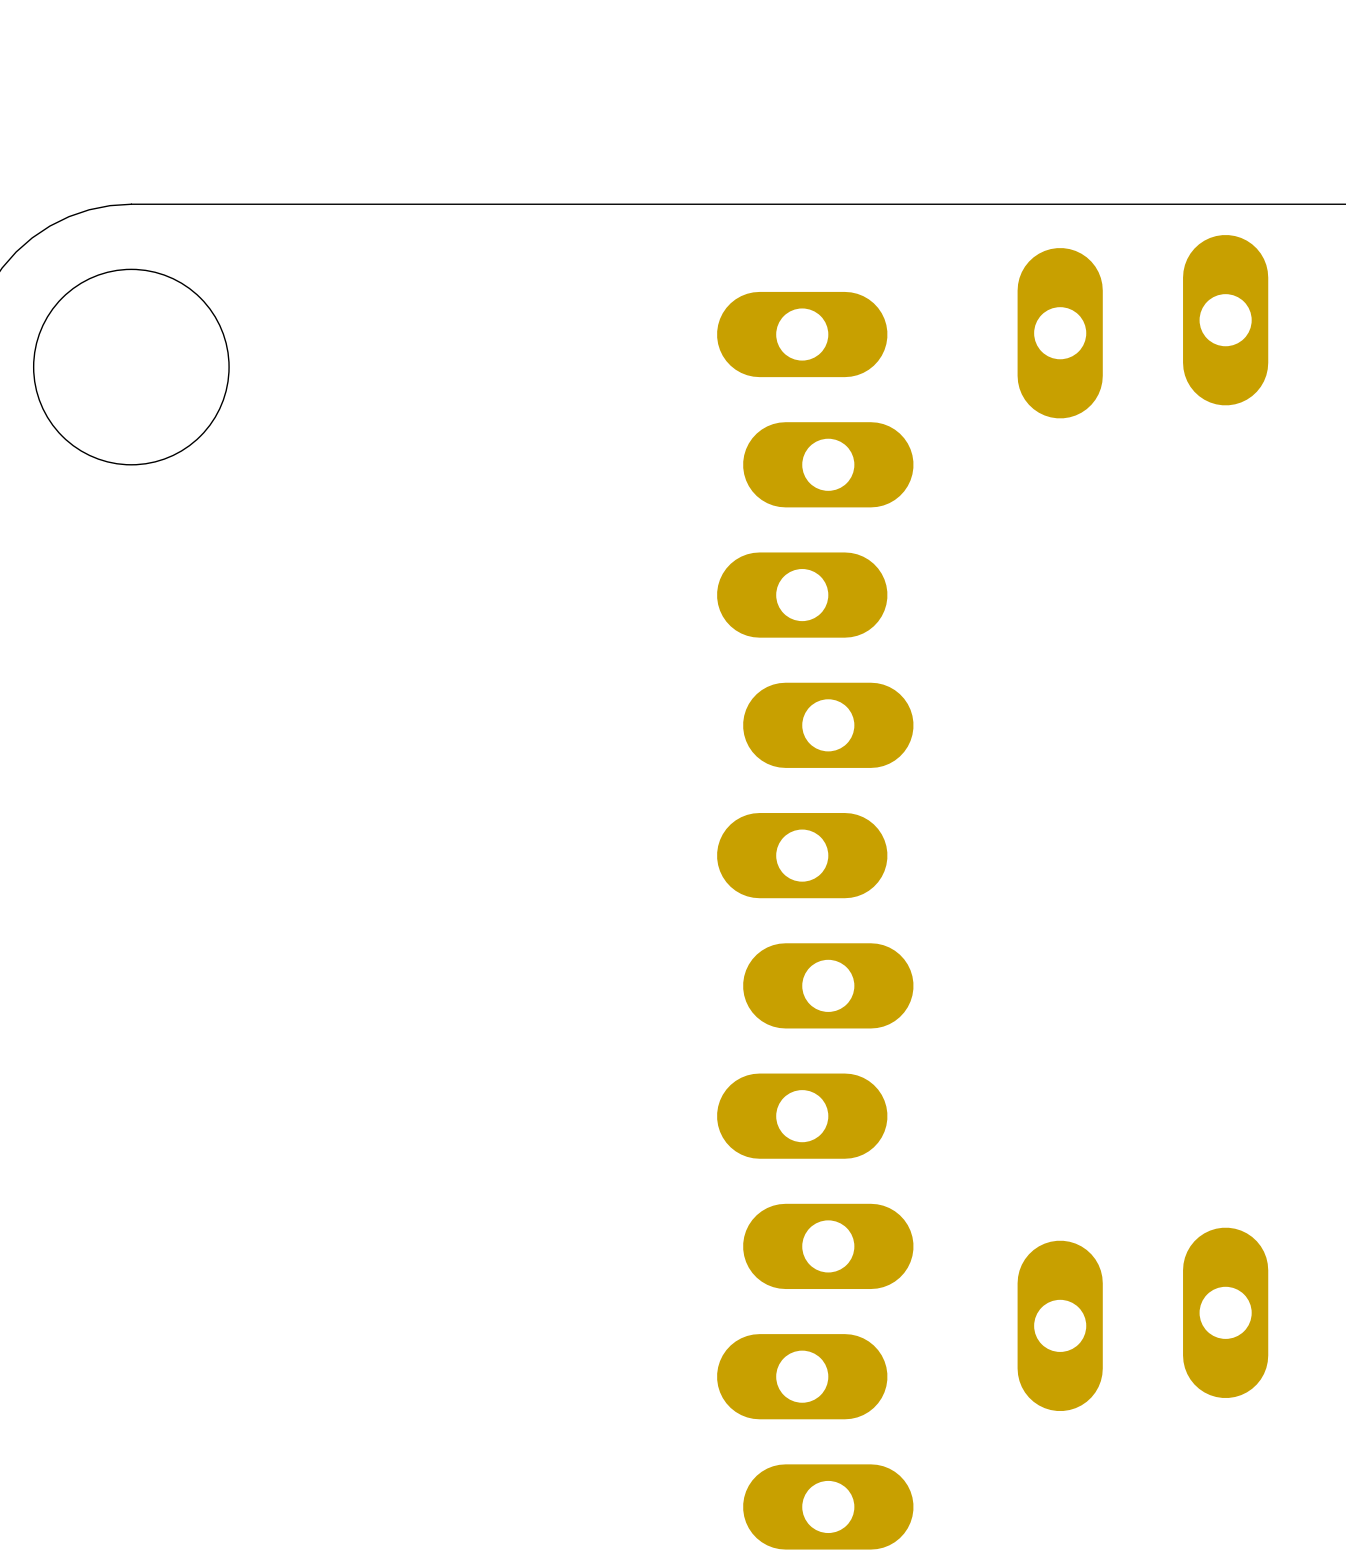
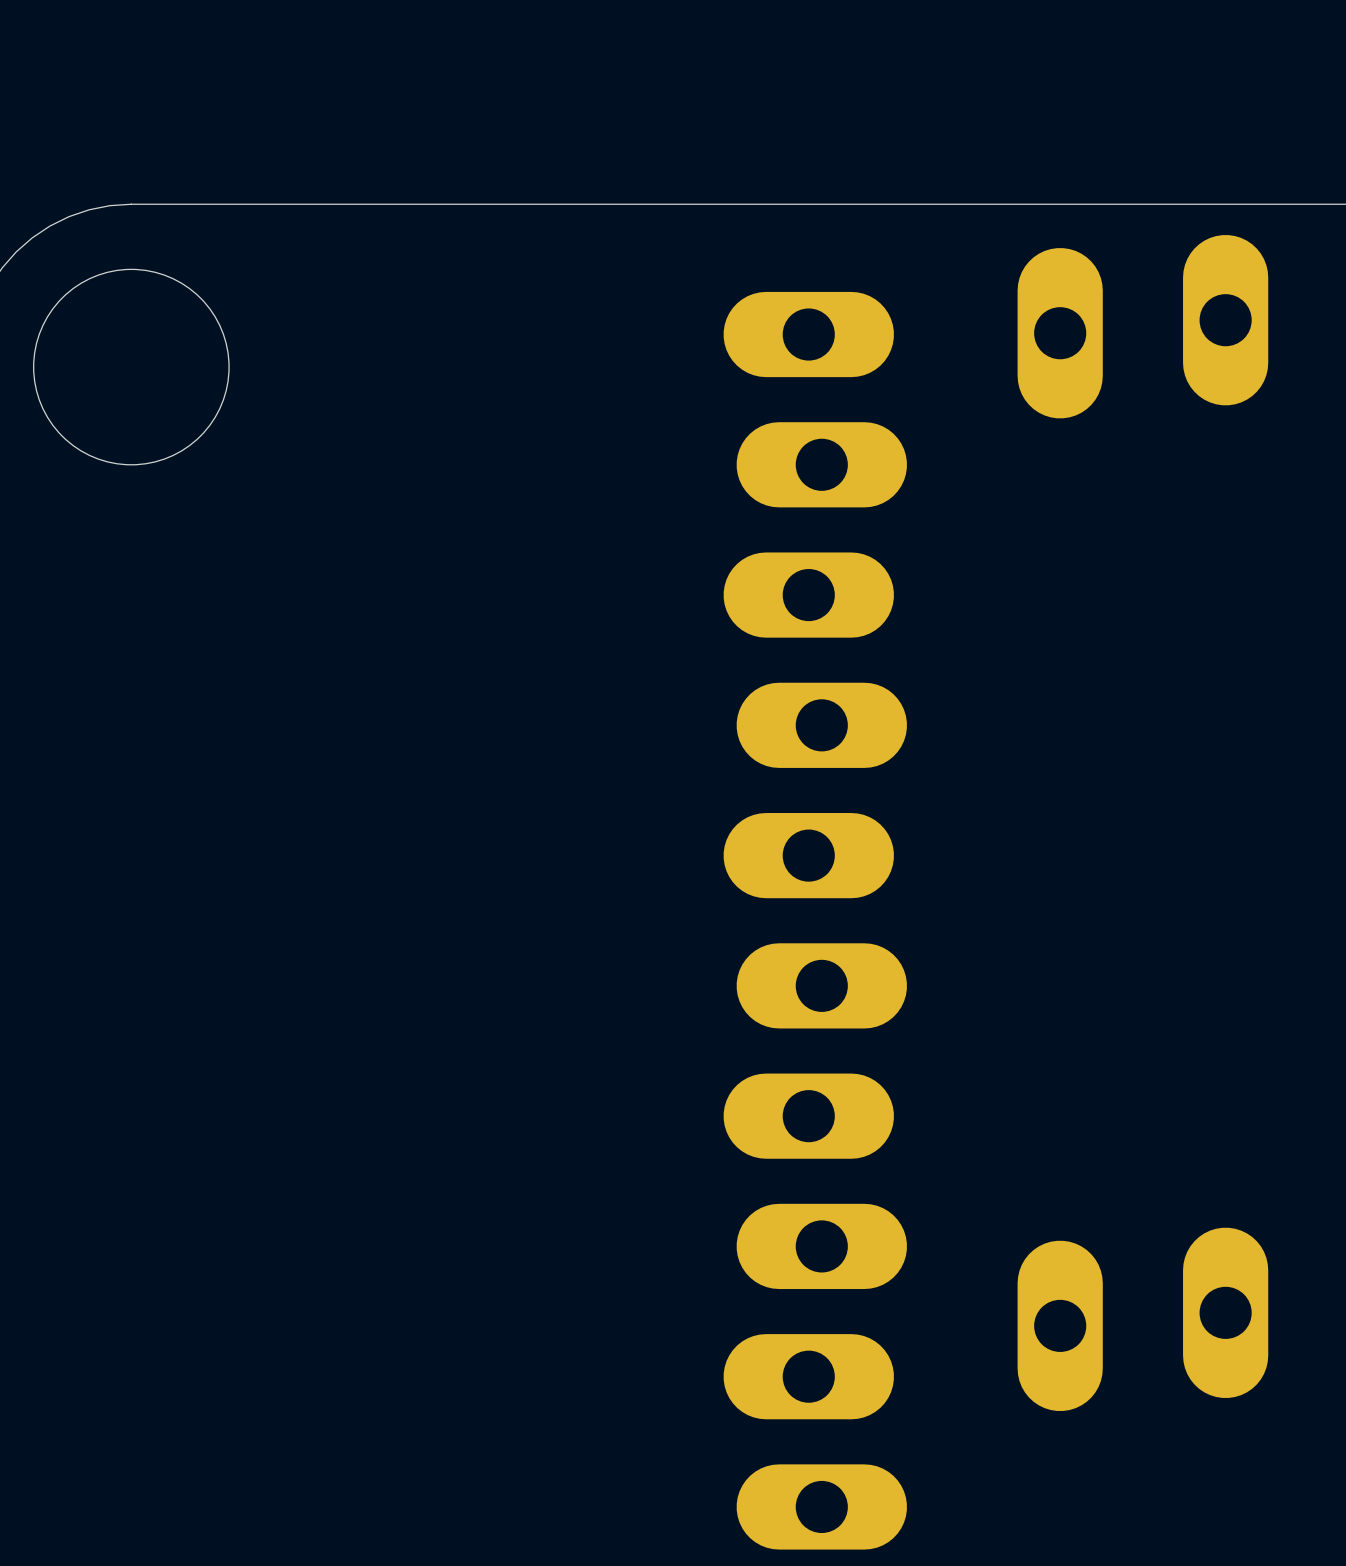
part footprint: [717, 291, 914, 1550] -> [723, 291, 907, 1550]

